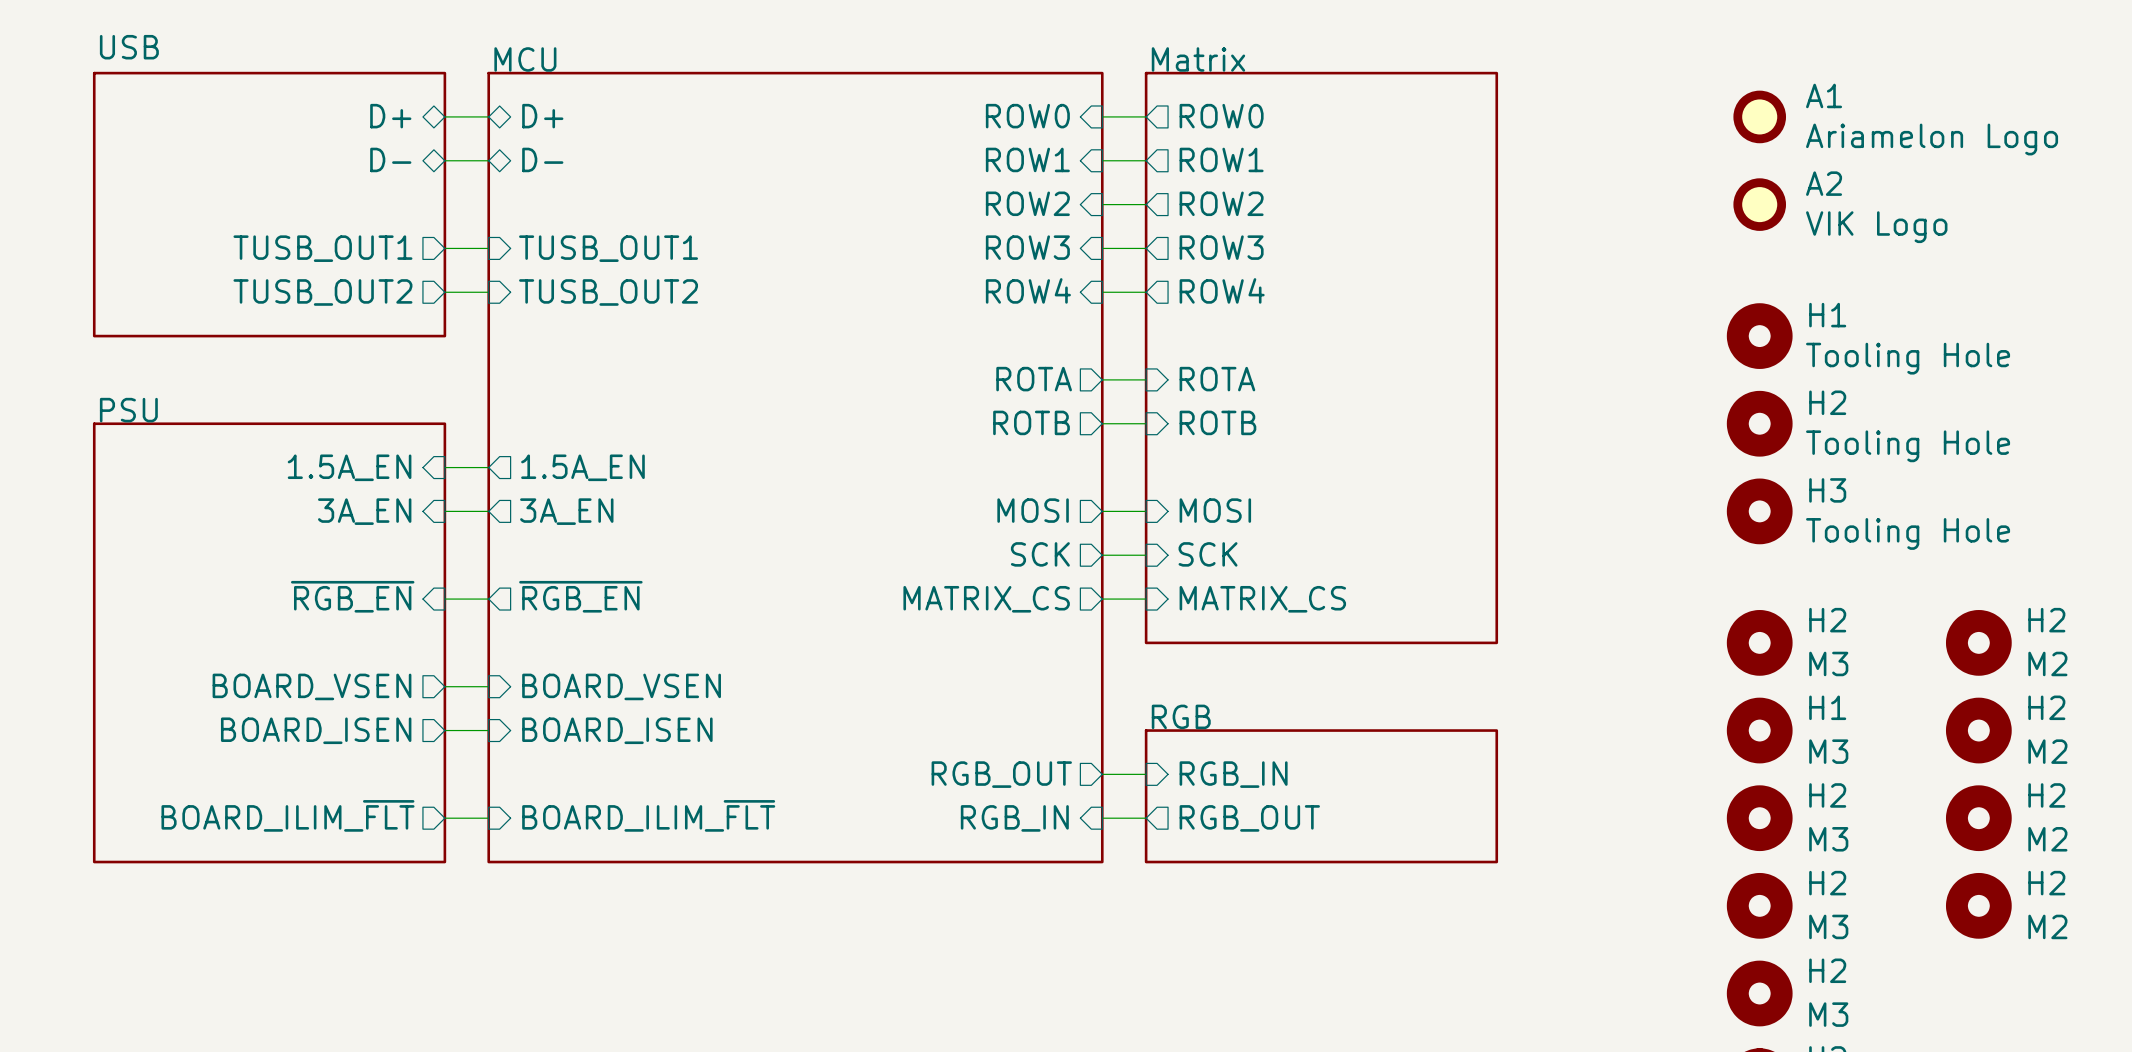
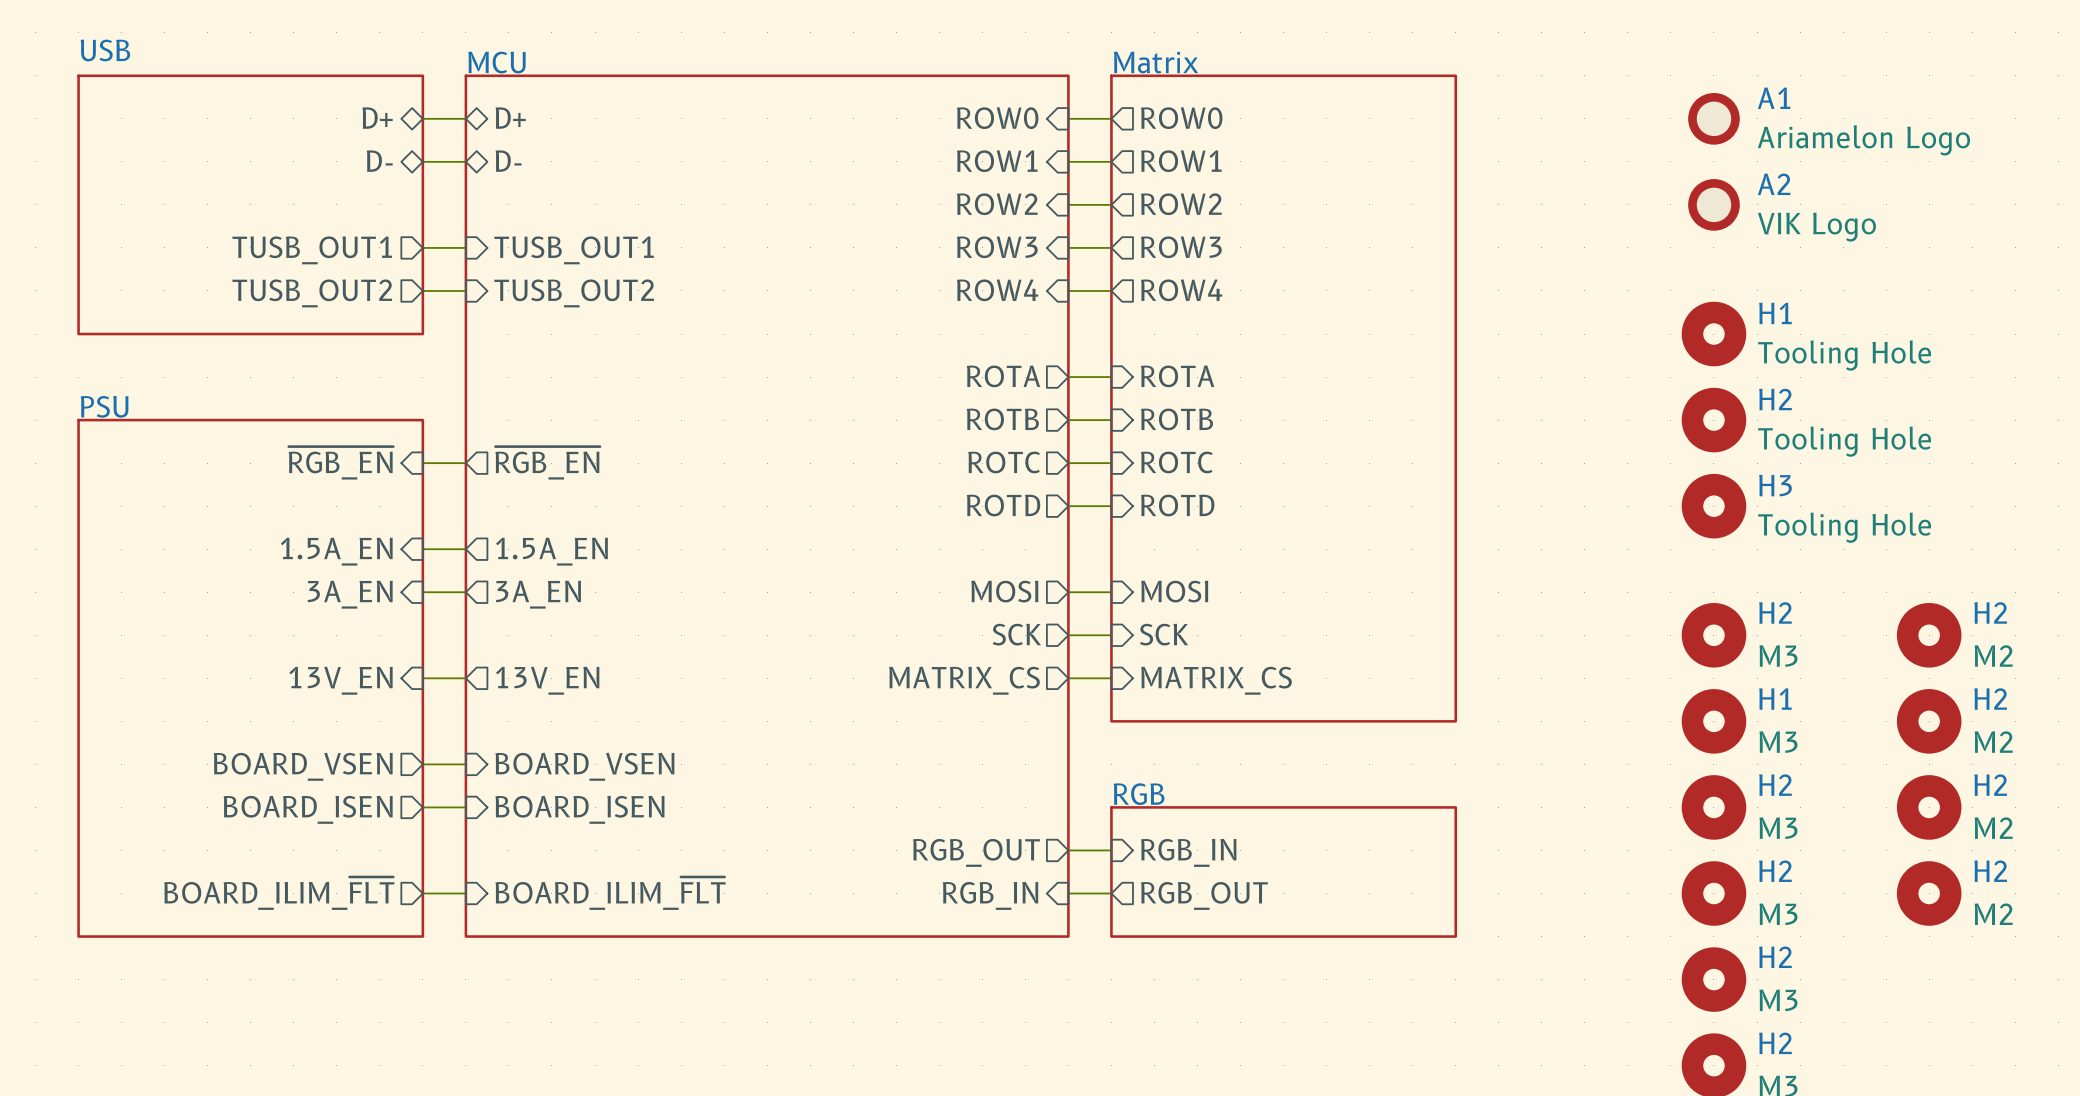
sheet Matrix: (1321, 358) -> none
sheet Matrix: none -> (1283, 398)
sheet pin: none -> ROTC (1004, 462)
sheet pin: none -> ROTC (1176, 462)
sheet pin: 1.5A_EN (349, 467) -> ~{RGB_EN} (341, 463)
sheet pin: 1.5A_EN (582, 467) -> ~{RGB_EN} (547, 463)
sheet MCU: (795, 467) -> none
wire: none -> (1068, 463) (1111, 463)
sheet pin: MOSI (1033, 510) -> ROTD (1003, 505)
sheet pin: MOSI (1215, 510) -> ROTD (1177, 505)
sheet pin: 3A_EN (364, 511) -> 1.5A_EN (336, 551)
wire: (444, 511) (488, 511) -> (422, 549) (465, 549)
sheet pin: 3A_EN (566, 511) -> 1.5A_EN (551, 551)
sheet MCU: none -> (767, 506)
sheet pin: SCK (1040, 554) -> none
sheet pin: SCK (1208, 554) -> none
wire: (1102, 555) (1146, 555) -> (1068, 635) (1111, 635)
sheet pin: ~{RGB_EN} (352, 596) -> 3A_EN (350, 594)
sheet pin: ~{RGB_EN} (580, 596) -> 3A_EN (538, 594)
sheet pin: MATRIX_CS (986, 599) -> MOSI (1004, 591)
sheet pin: MATRIX_CS (1262, 599) -> MOSI (1174, 591)
sheet PSU: (269, 642) -> none
sheet pin: none -> SCK (1016, 634)
sheet pin: none -> SCK (1164, 634)
sheet PSU: none -> (250, 678)
sheet pin shape: output (312, 686) -> input (340, 680)
sheet pin: BOARD_VSEN (312, 686) -> 13V_EN (340, 680)
sheet pin shape: input (621, 686) -> output (547, 680)
sheet pin: BOARD_VSEN (621, 686) -> 13V_EN (547, 680)
sheet pin: none -> MATRIX_CS (964, 680)
sheet pin: none -> MATRIX_CS (1216, 680)
sheet pin: BOARD_ISEN (316, 730) -> BOARD_VSEN (303, 766)
wire: (444, 730) (488, 730) -> (422, 764) (465, 764)
sheet pin: BOARD_ISEN (617, 730) -> BOARD_VSEN (584, 766)
sheet pin: RGB_OUT (1001, 774) -> none
wire: (1102, 774) (1146, 774) -> (1068, 678) (1111, 678)
sheet pin: RGB_IN (1233, 774) -> none
sheet RGB position: (1321, 796) -> (1283, 871)
sheet pin: BOARD_ILIM_~{FLT} (288, 815) -> BOARD_ISEN (308, 809)
sheet pin: BOARD_ILIM_~{FLT} (648, 815) -> BOARD_ISEN (579, 809)
sheet pin shape: input (1014, 818) -> output (976, 852)
sheet pin: RGB_IN (1014, 818) -> RGB_OUT (976, 852)
wire: (1102, 818) (1146, 818) -> (1068, 850) (1111, 850)
sheet pin shape: output (1249, 818) -> input (1188, 852)
sheet pin: RGB_OUT (1249, 818) -> RGB_IN (1188, 852)
sheet pin: none -> BOARD_ILIM_~{FLT} (279, 893)
sheet pin: none -> BOARD_ILIM_~{FLT} (610, 893)
wire: none -> (422, 893) (465, 893)
wire: none -> (1068, 893) (1111, 893)
sheet pin: none -> RGB_IN (990, 895)
sheet pin: none -> RGB_OUT (1204, 895)

